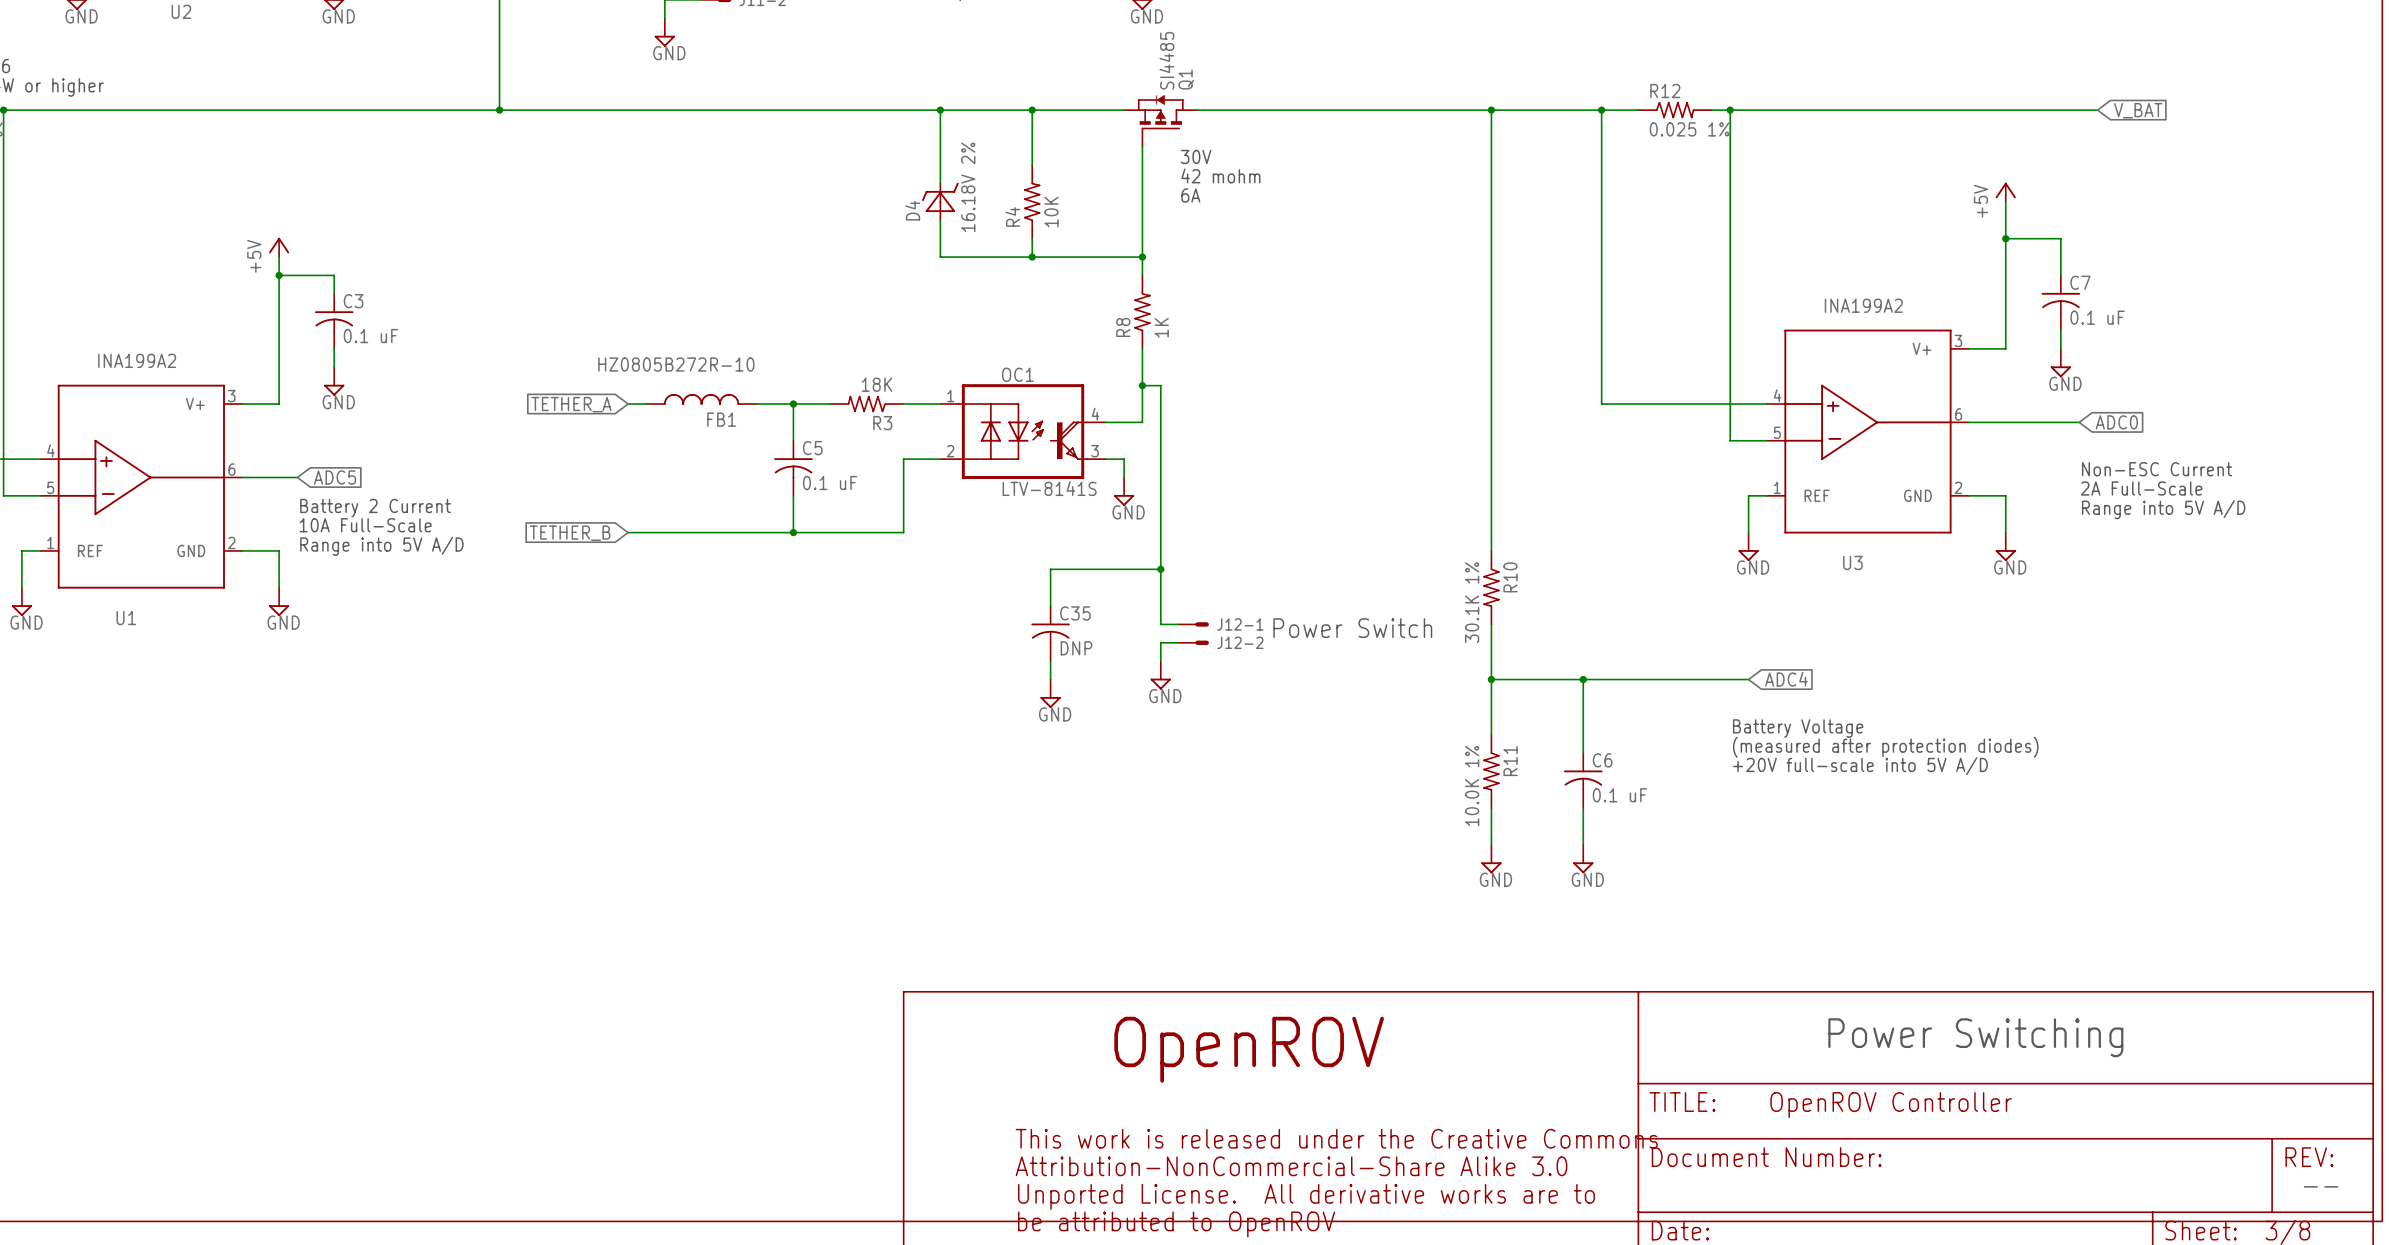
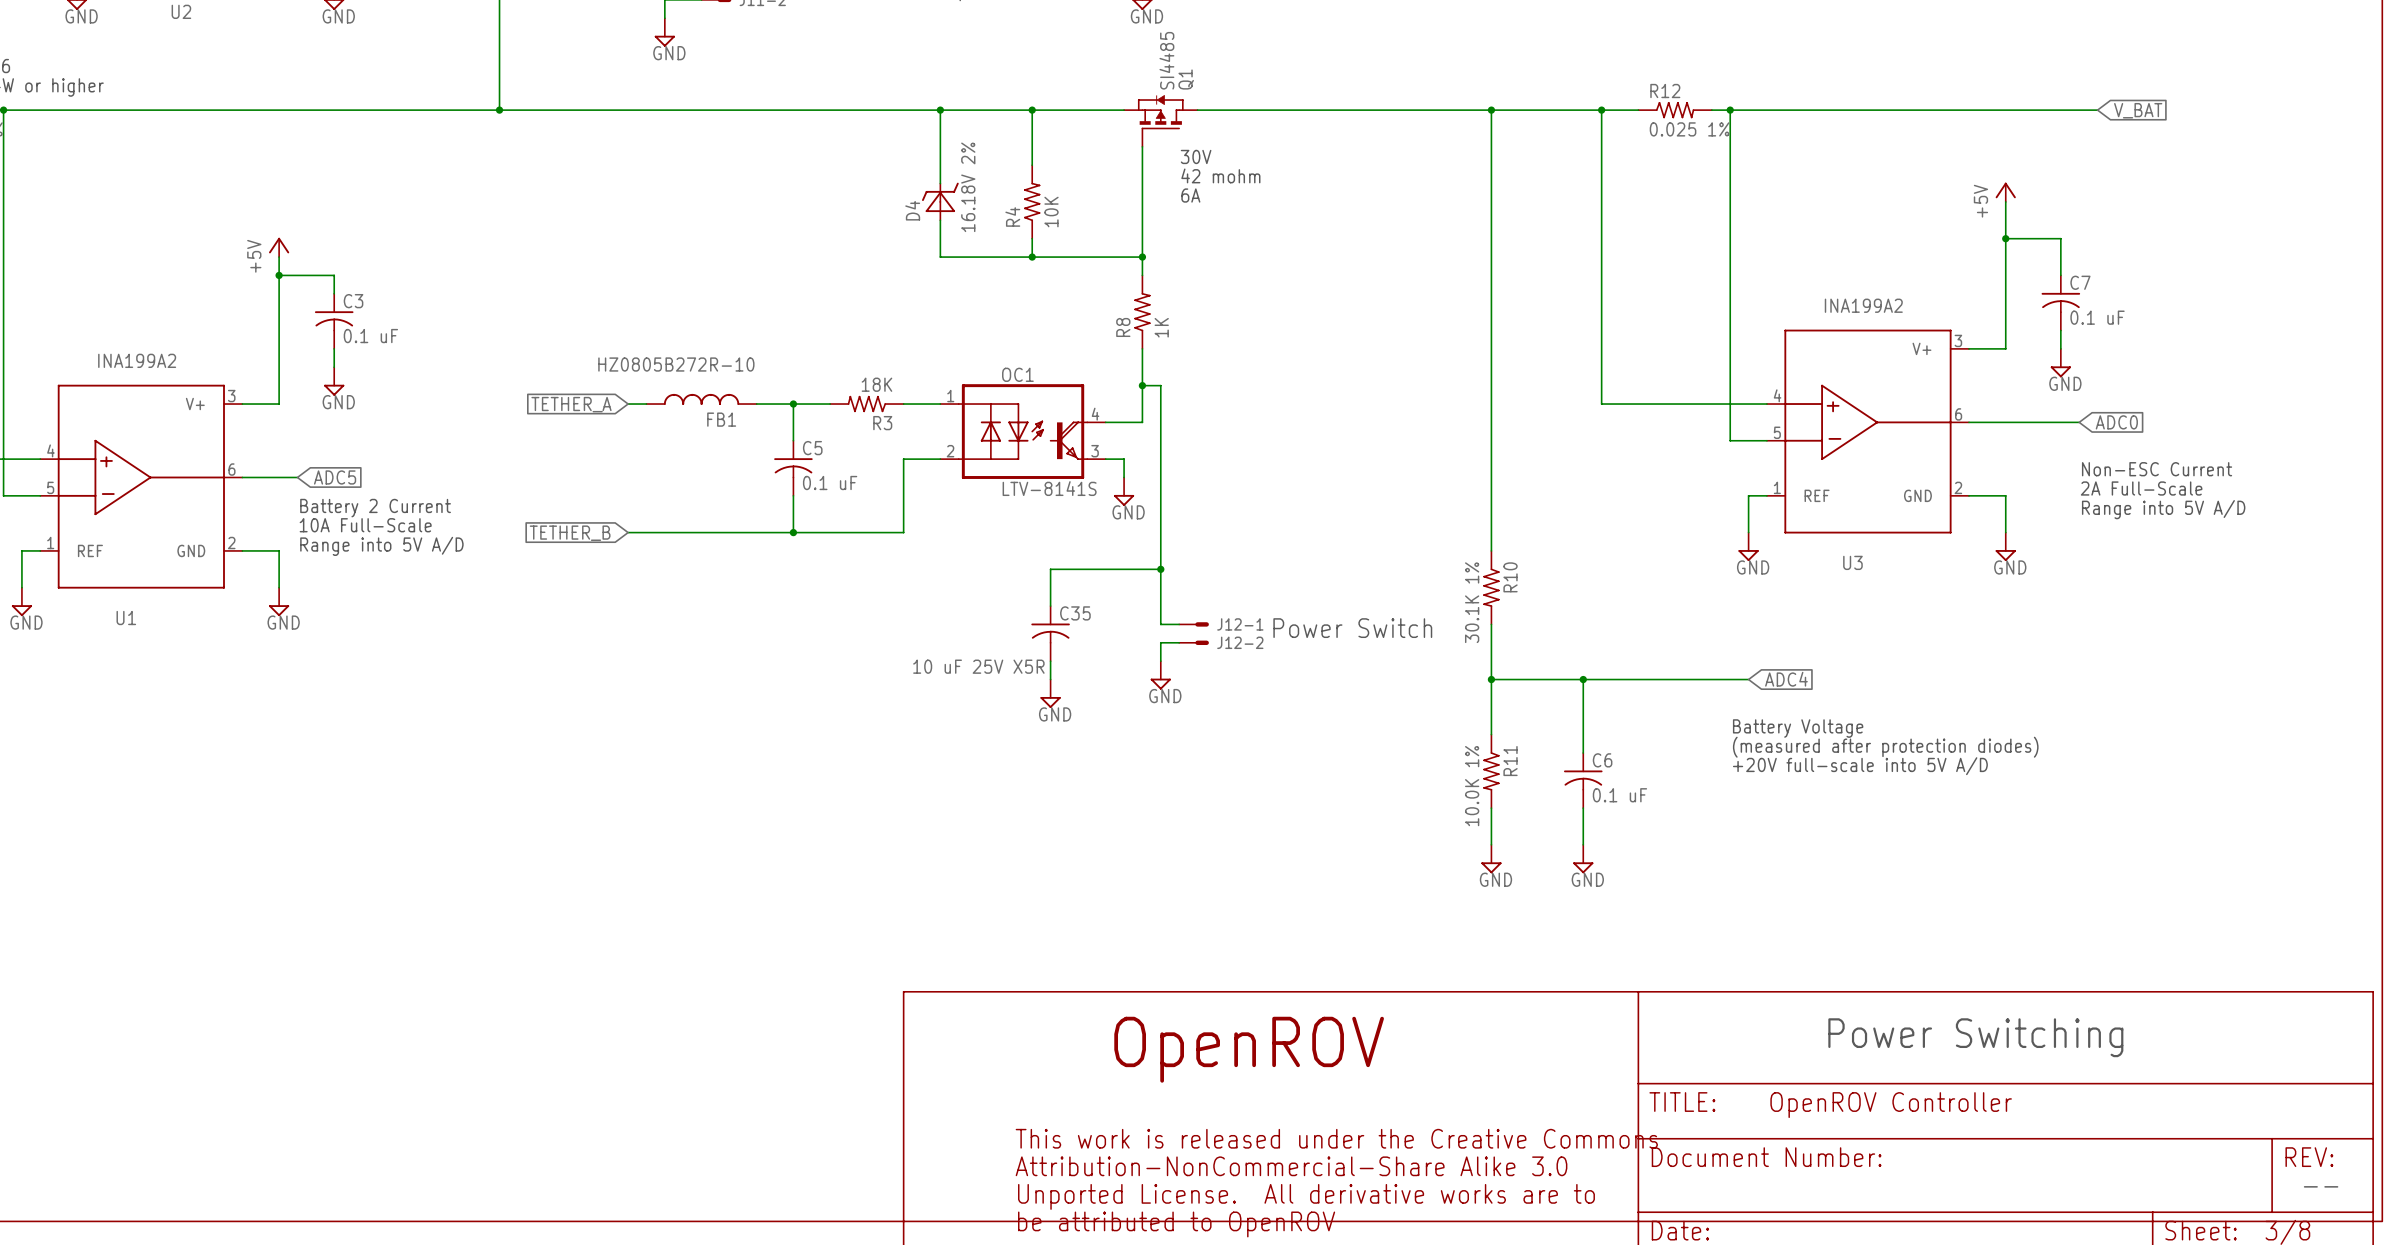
C35 value: DNP (1076, 648) -> 10 uF 25V X5R (978, 666)

